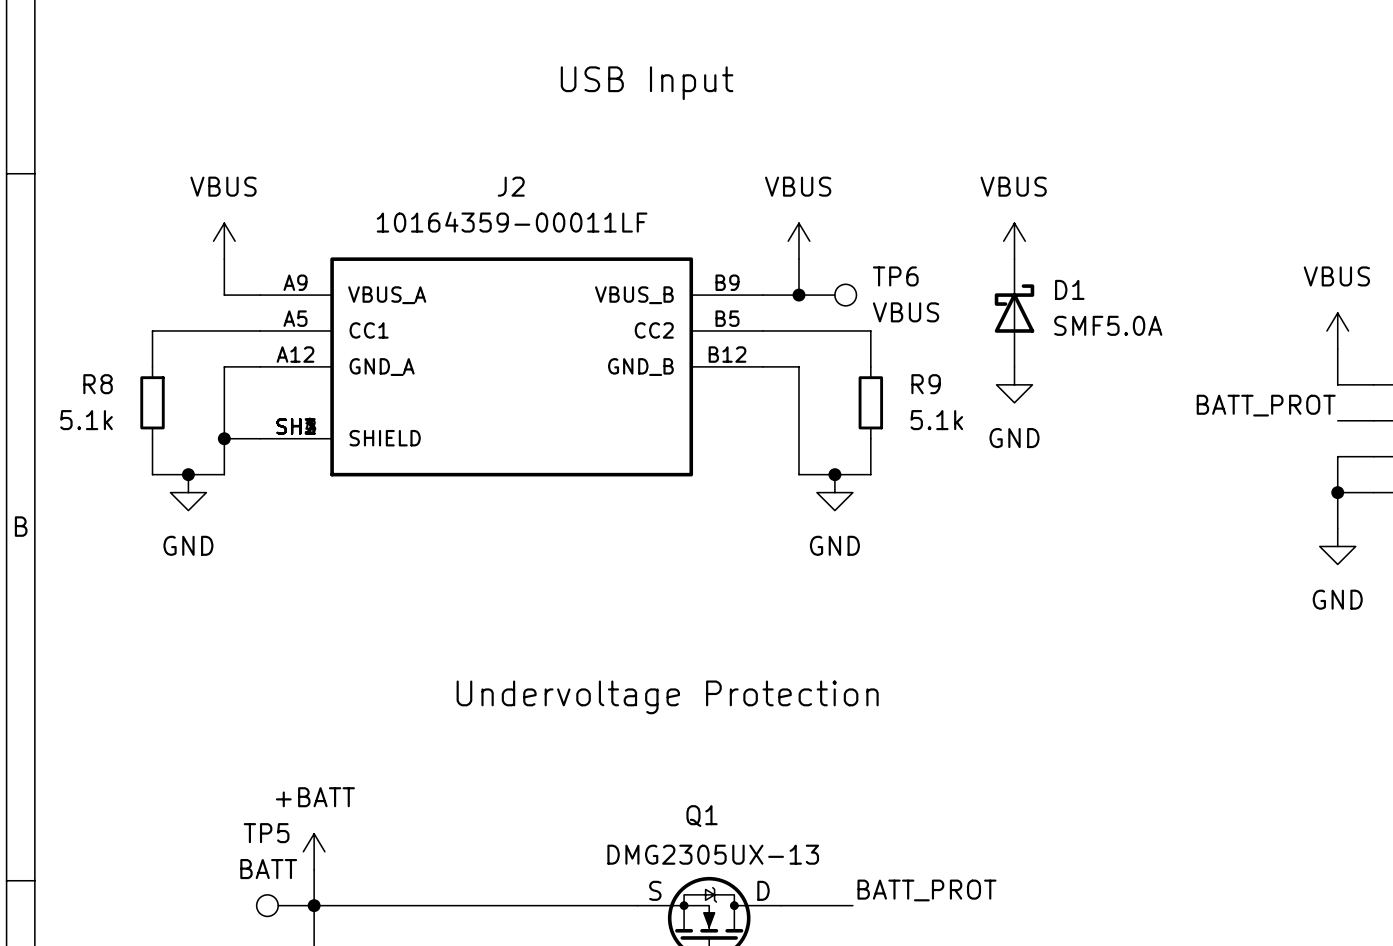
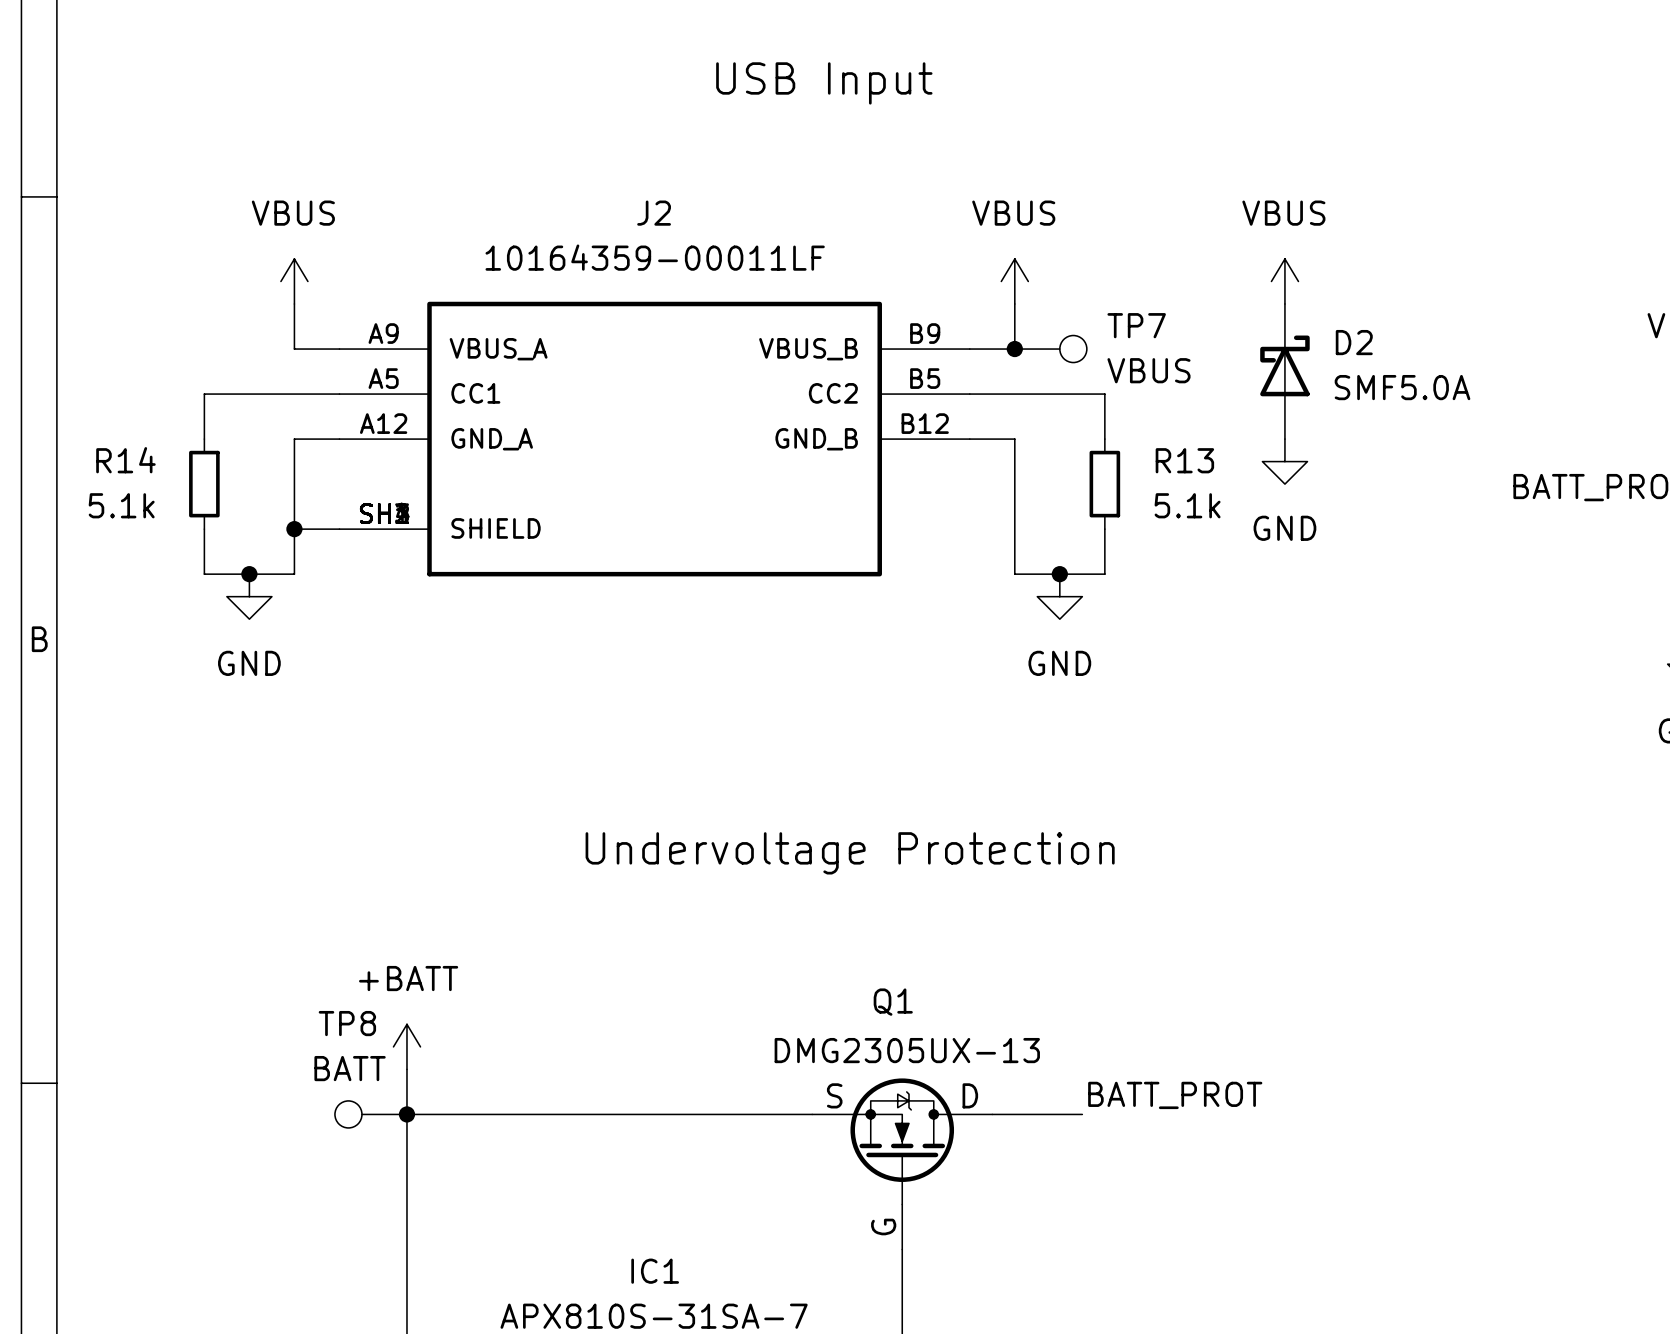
TP6 name: TP6 (895, 276) -> TP7 (1136, 325)
D1 name: D1 (1069, 289) -> D2 (1354, 342)
R8 name: R8 (98, 384) -> R14 (125, 460)
R9 name: R9 (926, 384) -> R13 (1184, 460)
TP5 name: TP5 (266, 833) -> TP8 (347, 1023)

